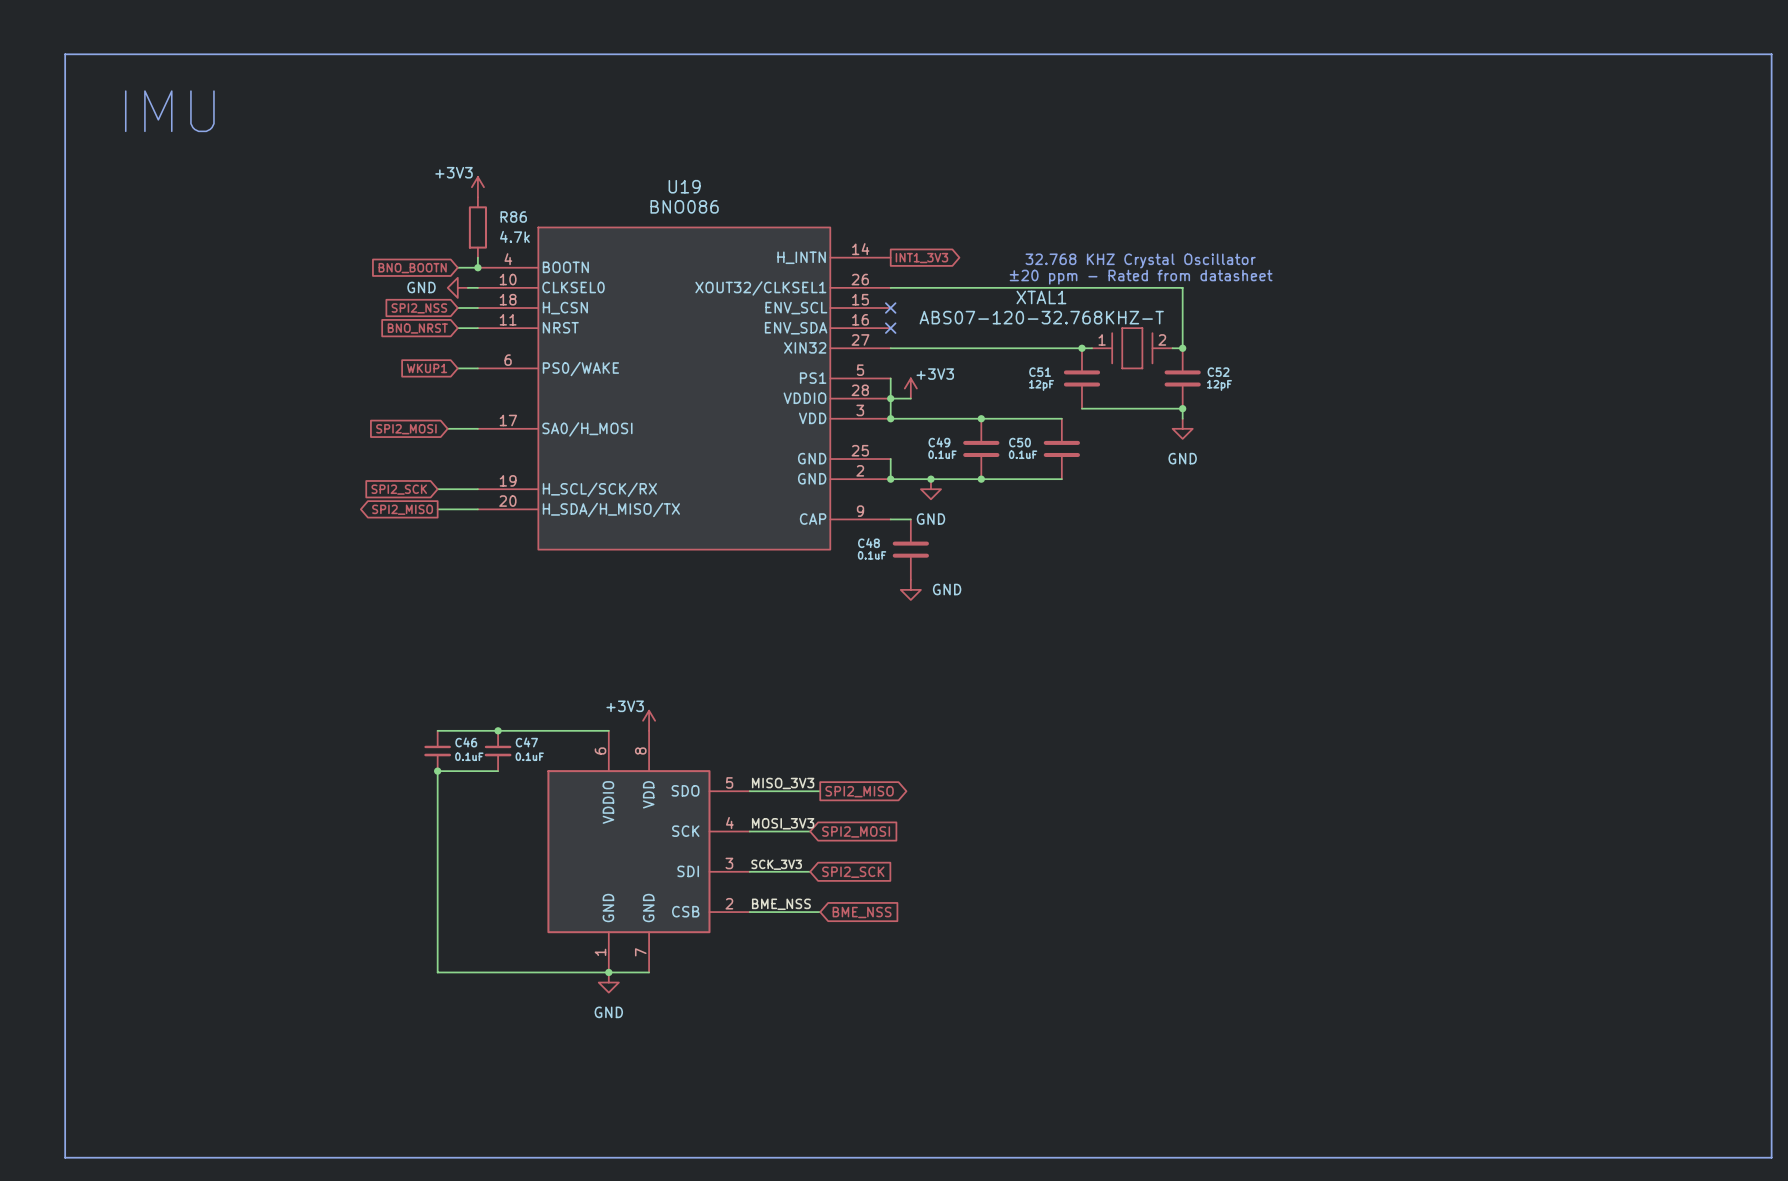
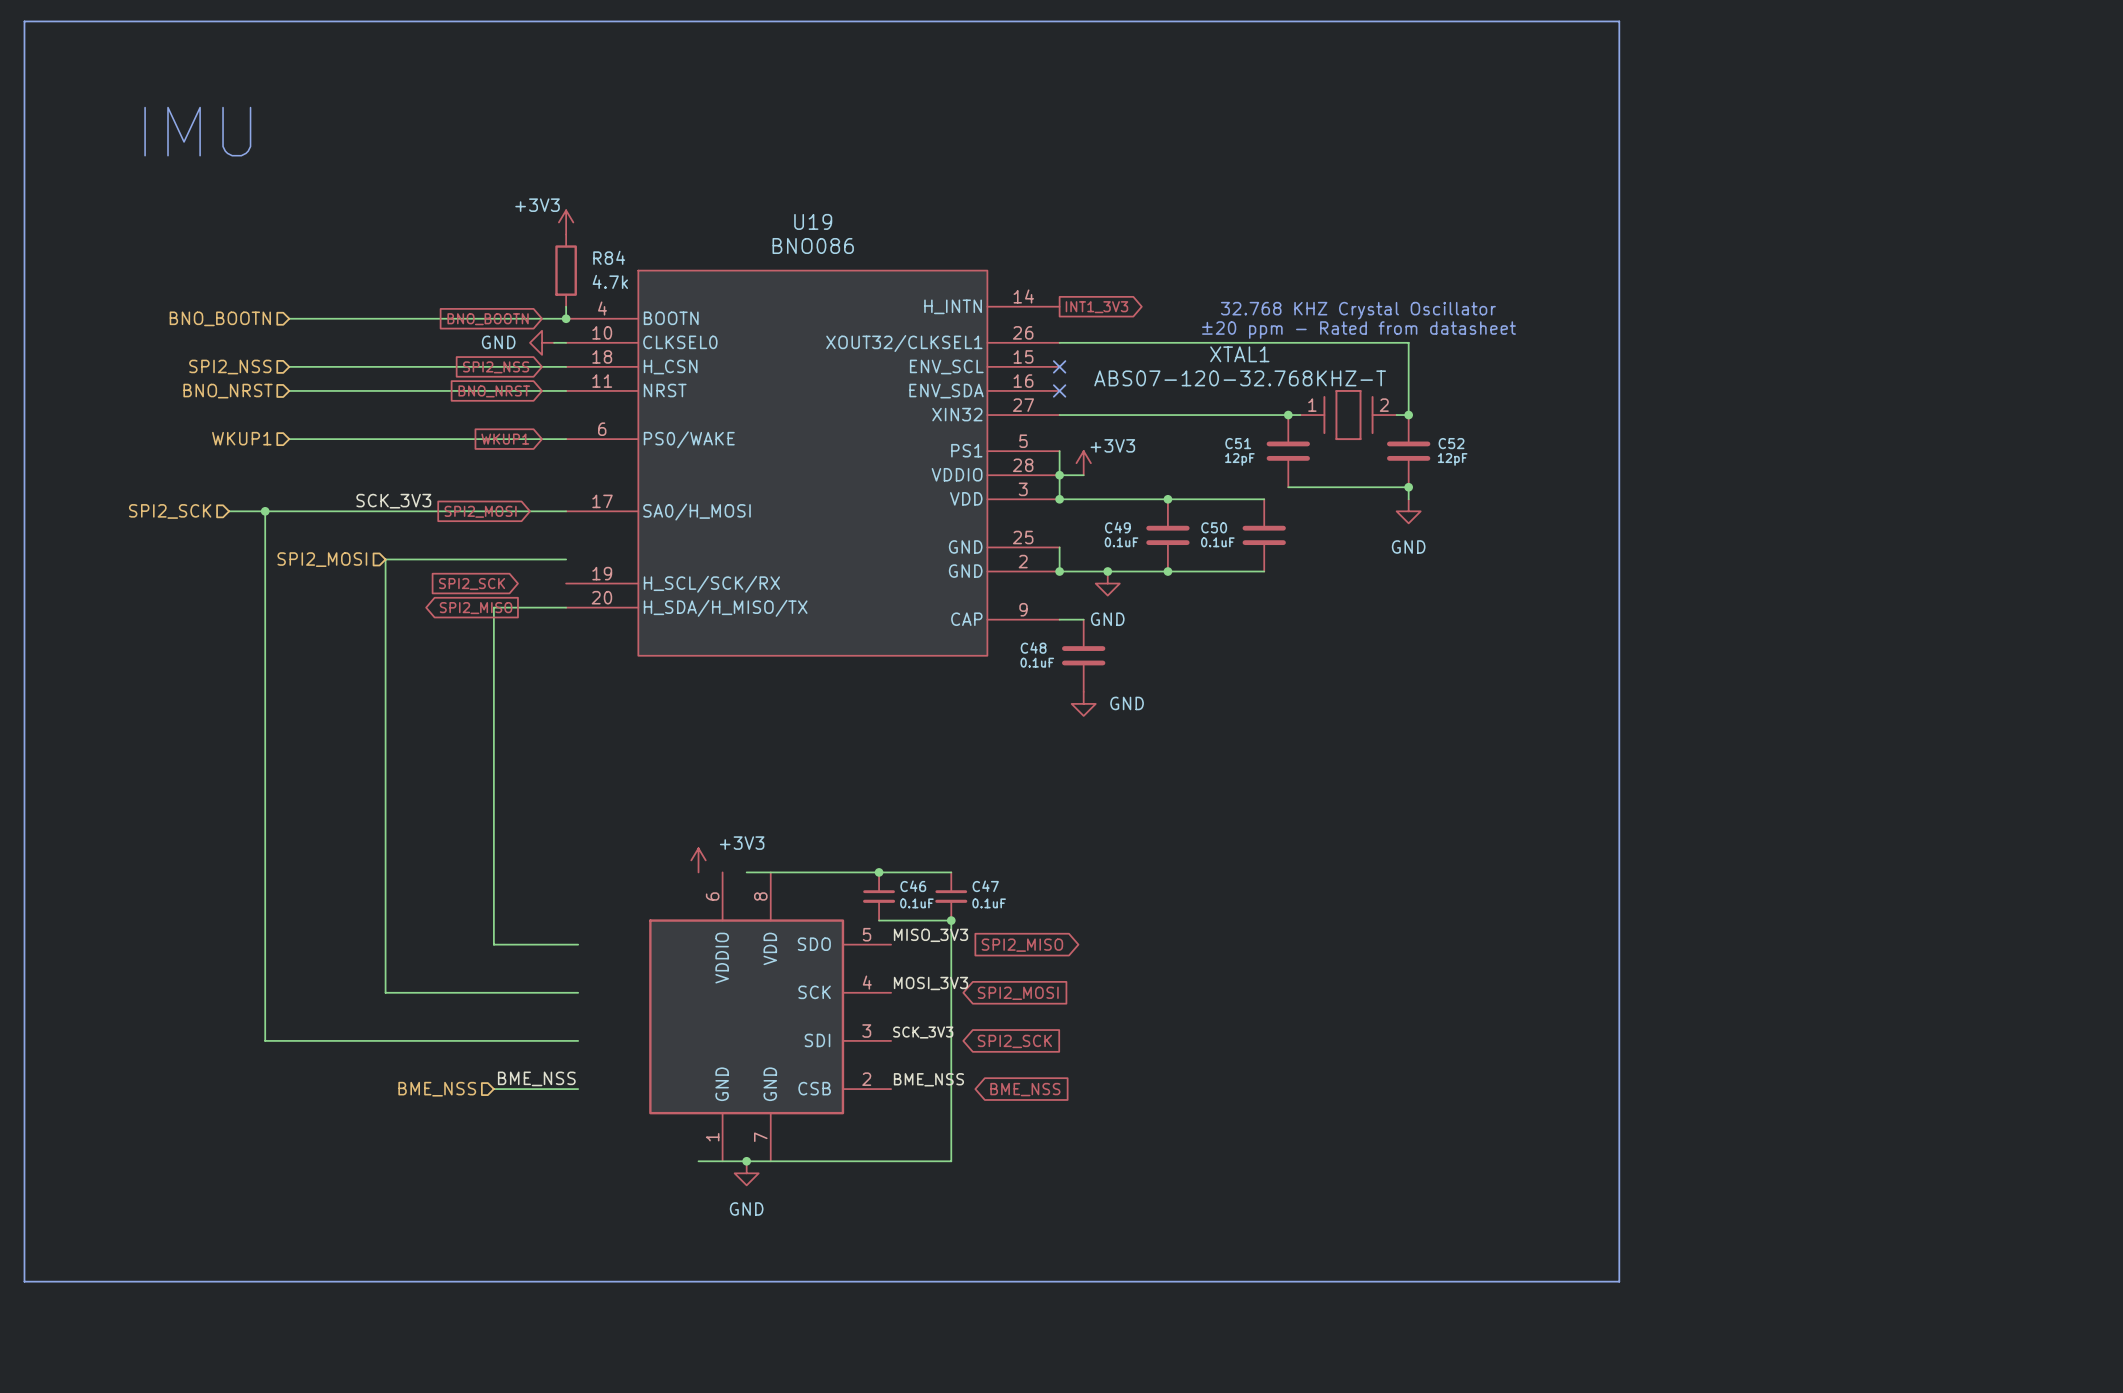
line: (65, 54) (1771, 54) (1771, 1157) (65, 1157) (65, 54) -> (24, 21) (24, 1281) (1619, 1281) (1619, 21) (24, 21)
R86 name: R86 (513, 217) -> R84 (609, 257)
hierarchical label: none -> BNO_BOOTN (220, 318)
wire: none -> (289, 318) (542, 318)
hierarchical label: none -> SPI2_NSS (230, 367)
wire: none -> (289, 366) (542, 366)
hierarchical label: none -> BNO_NRST (228, 391)
wire: none -> (289, 390) (542, 390)
hierarchical label: none -> WKUP1 (241, 438)
wire: none -> (289, 439) (542, 439)
label: none -> SCK_3V3 (393, 501)
hierarchical label: none -> SPI2_SCK (170, 511)
wire: none -> (229, 511) (530, 511)
wire: none -> (265, 511) (265, 1040) (578, 1040)
junction: none -> (265, 511)
hierarchical label: none -> SPI2_MOSI (322, 559)
wire: none -> (566, 559) (385, 559) (385, 992) (578, 992)
wire: (437, 489) (477, 489) -> none
wire: none -> (517, 607) (493, 607) (493, 944) (578, 944)
power symbol position: +3V3 (649, 720) -> +3V3 (698, 860)
wire: (437, 730) (608, 730) -> (746, 872) (951, 872)
junction: (498, 730) -> none
junction: none -> (879, 872)
C46 position: (437, 750) -> (879, 896)
C47 position: (498, 750) -> (951, 896)
junction: (437, 771) -> none
wire: (498, 771) (437, 771) (437, 972) (588, 972) -> none
wire: none -> (879, 920) (951, 920) (951, 1161) (770, 1161)
junction: none -> (951, 920)
wire: (749, 791) (820, 791) -> none
wire: (749, 831) (810, 831) -> none
wire: (749, 871) (810, 871) -> none
label: none -> BME_NSS (536, 1078)
hierarchical label: none -> BME_NSS (437, 1089)
wire: none -> (493, 1089) (578, 1089)
wire: (749, 912) (820, 912) -> none
junction position: (608, 972) -> (746, 1161)
power symbol position: GND (608, 982) -> GND (746, 1173)

